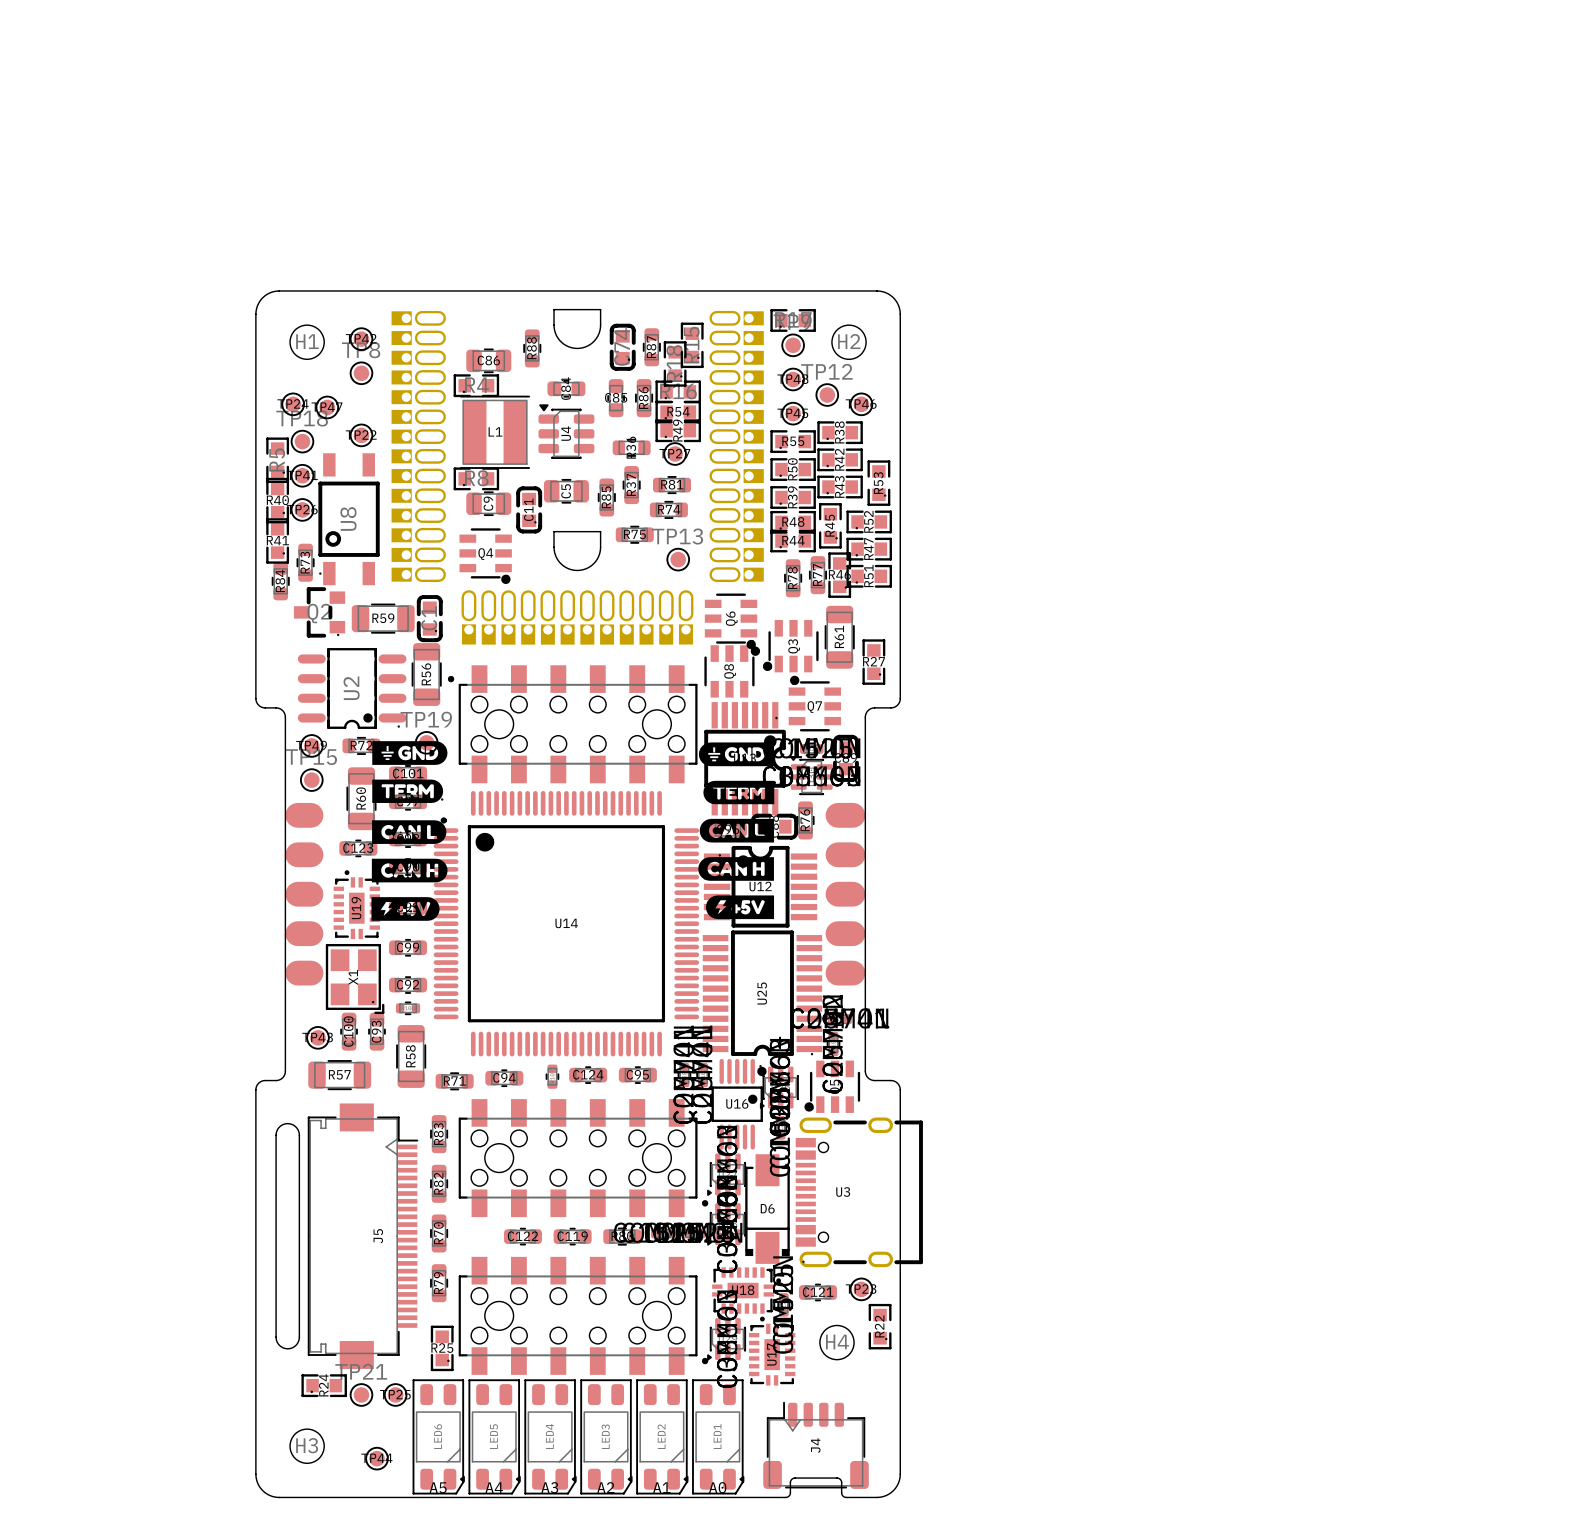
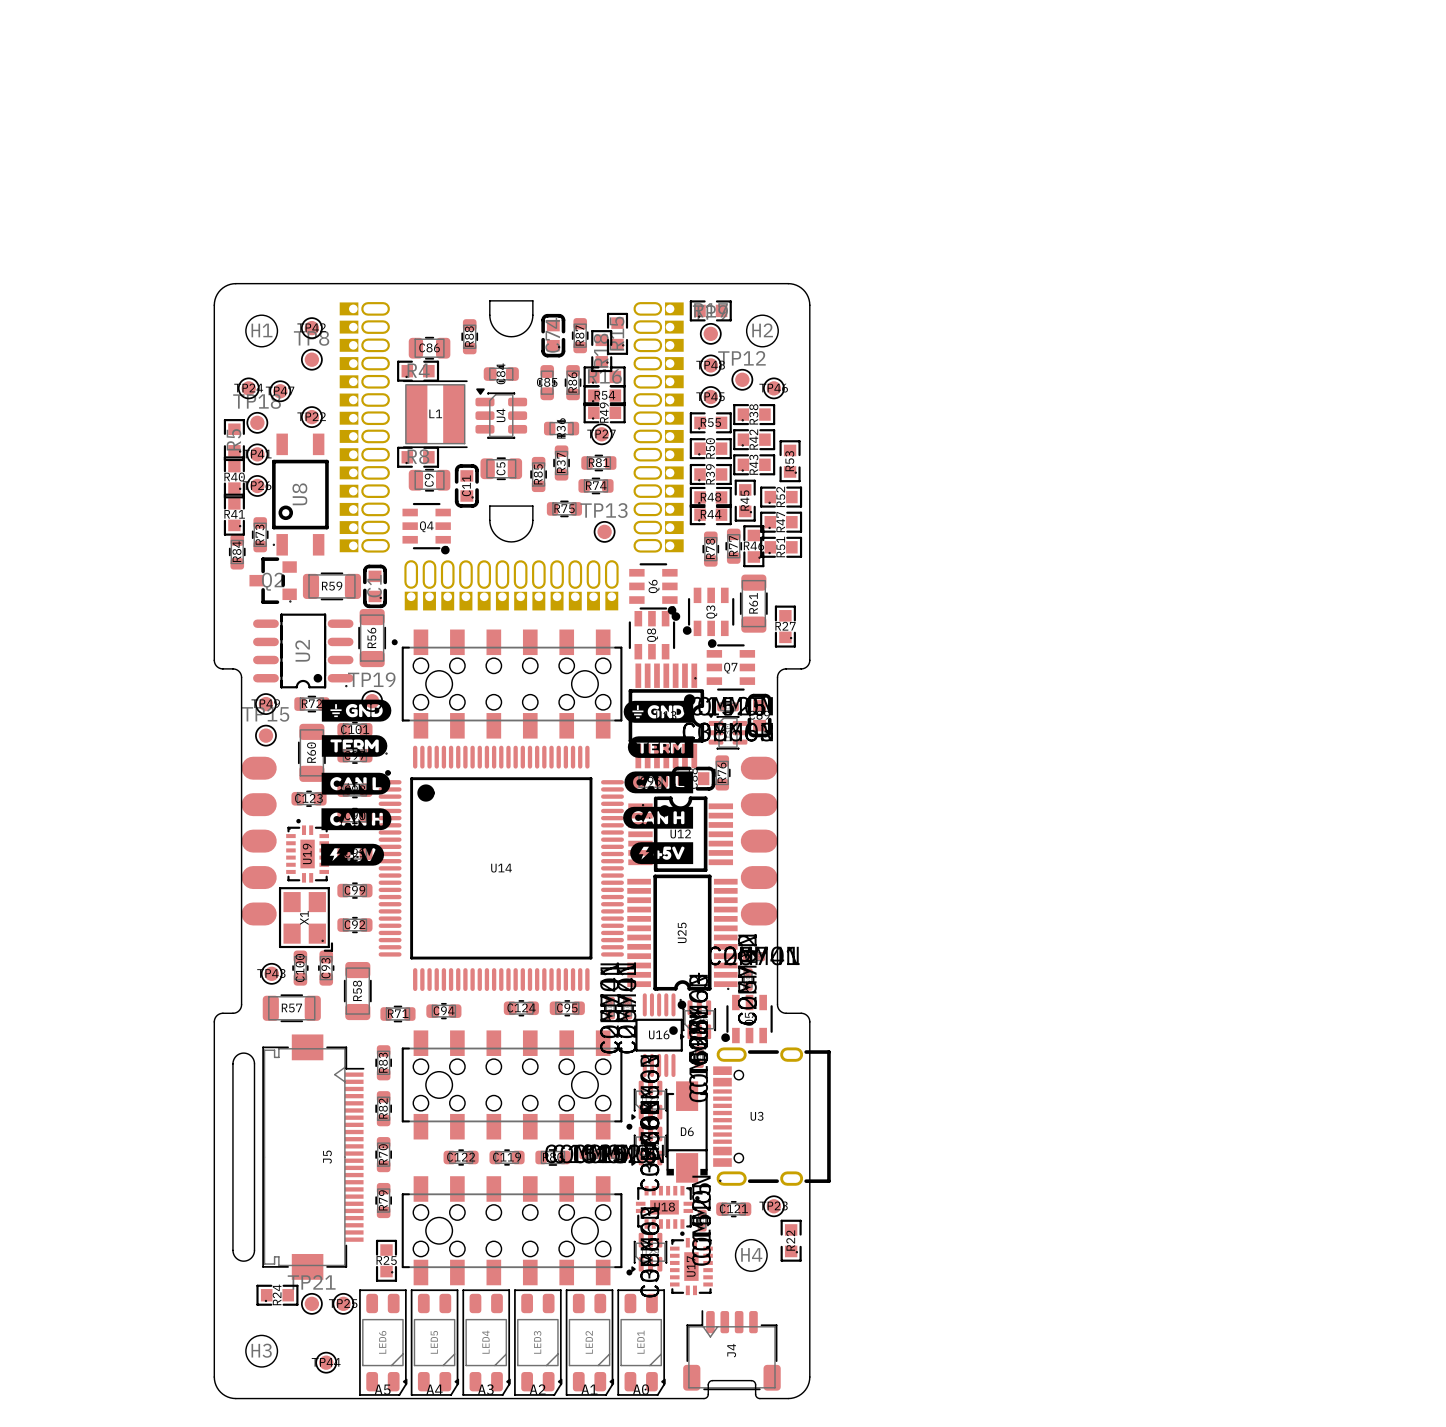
part: (408, 1008) -> none
part: (552, 1076) -> none

